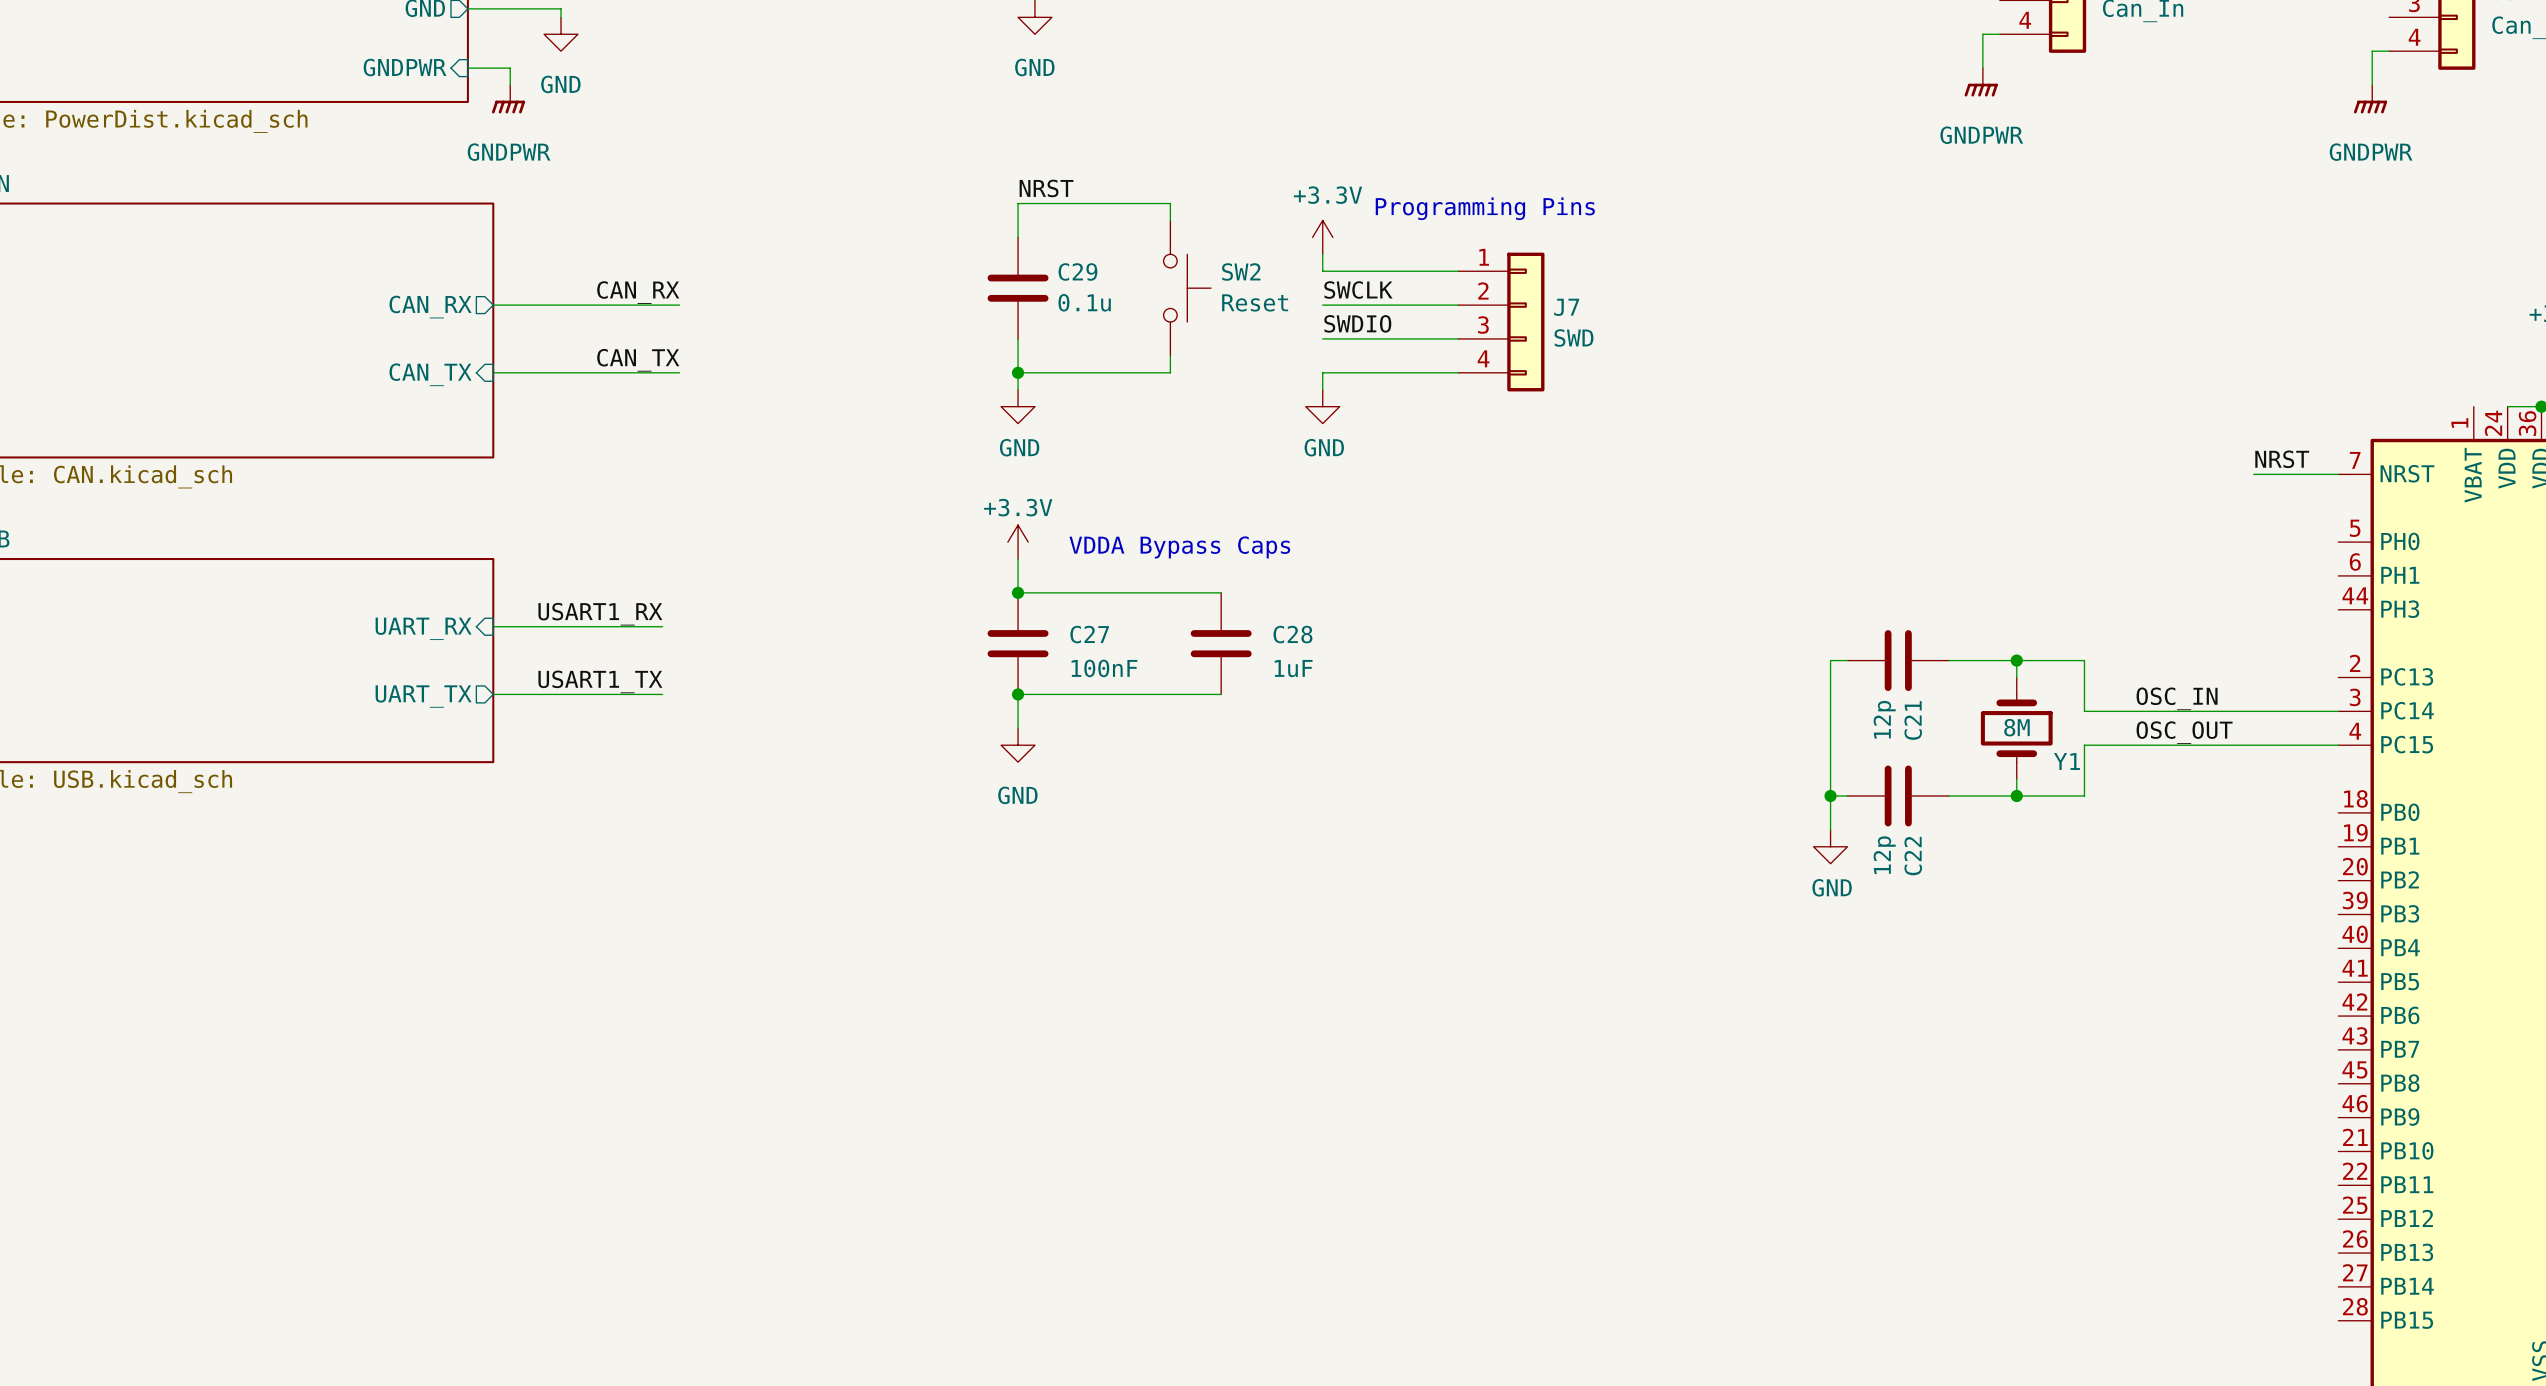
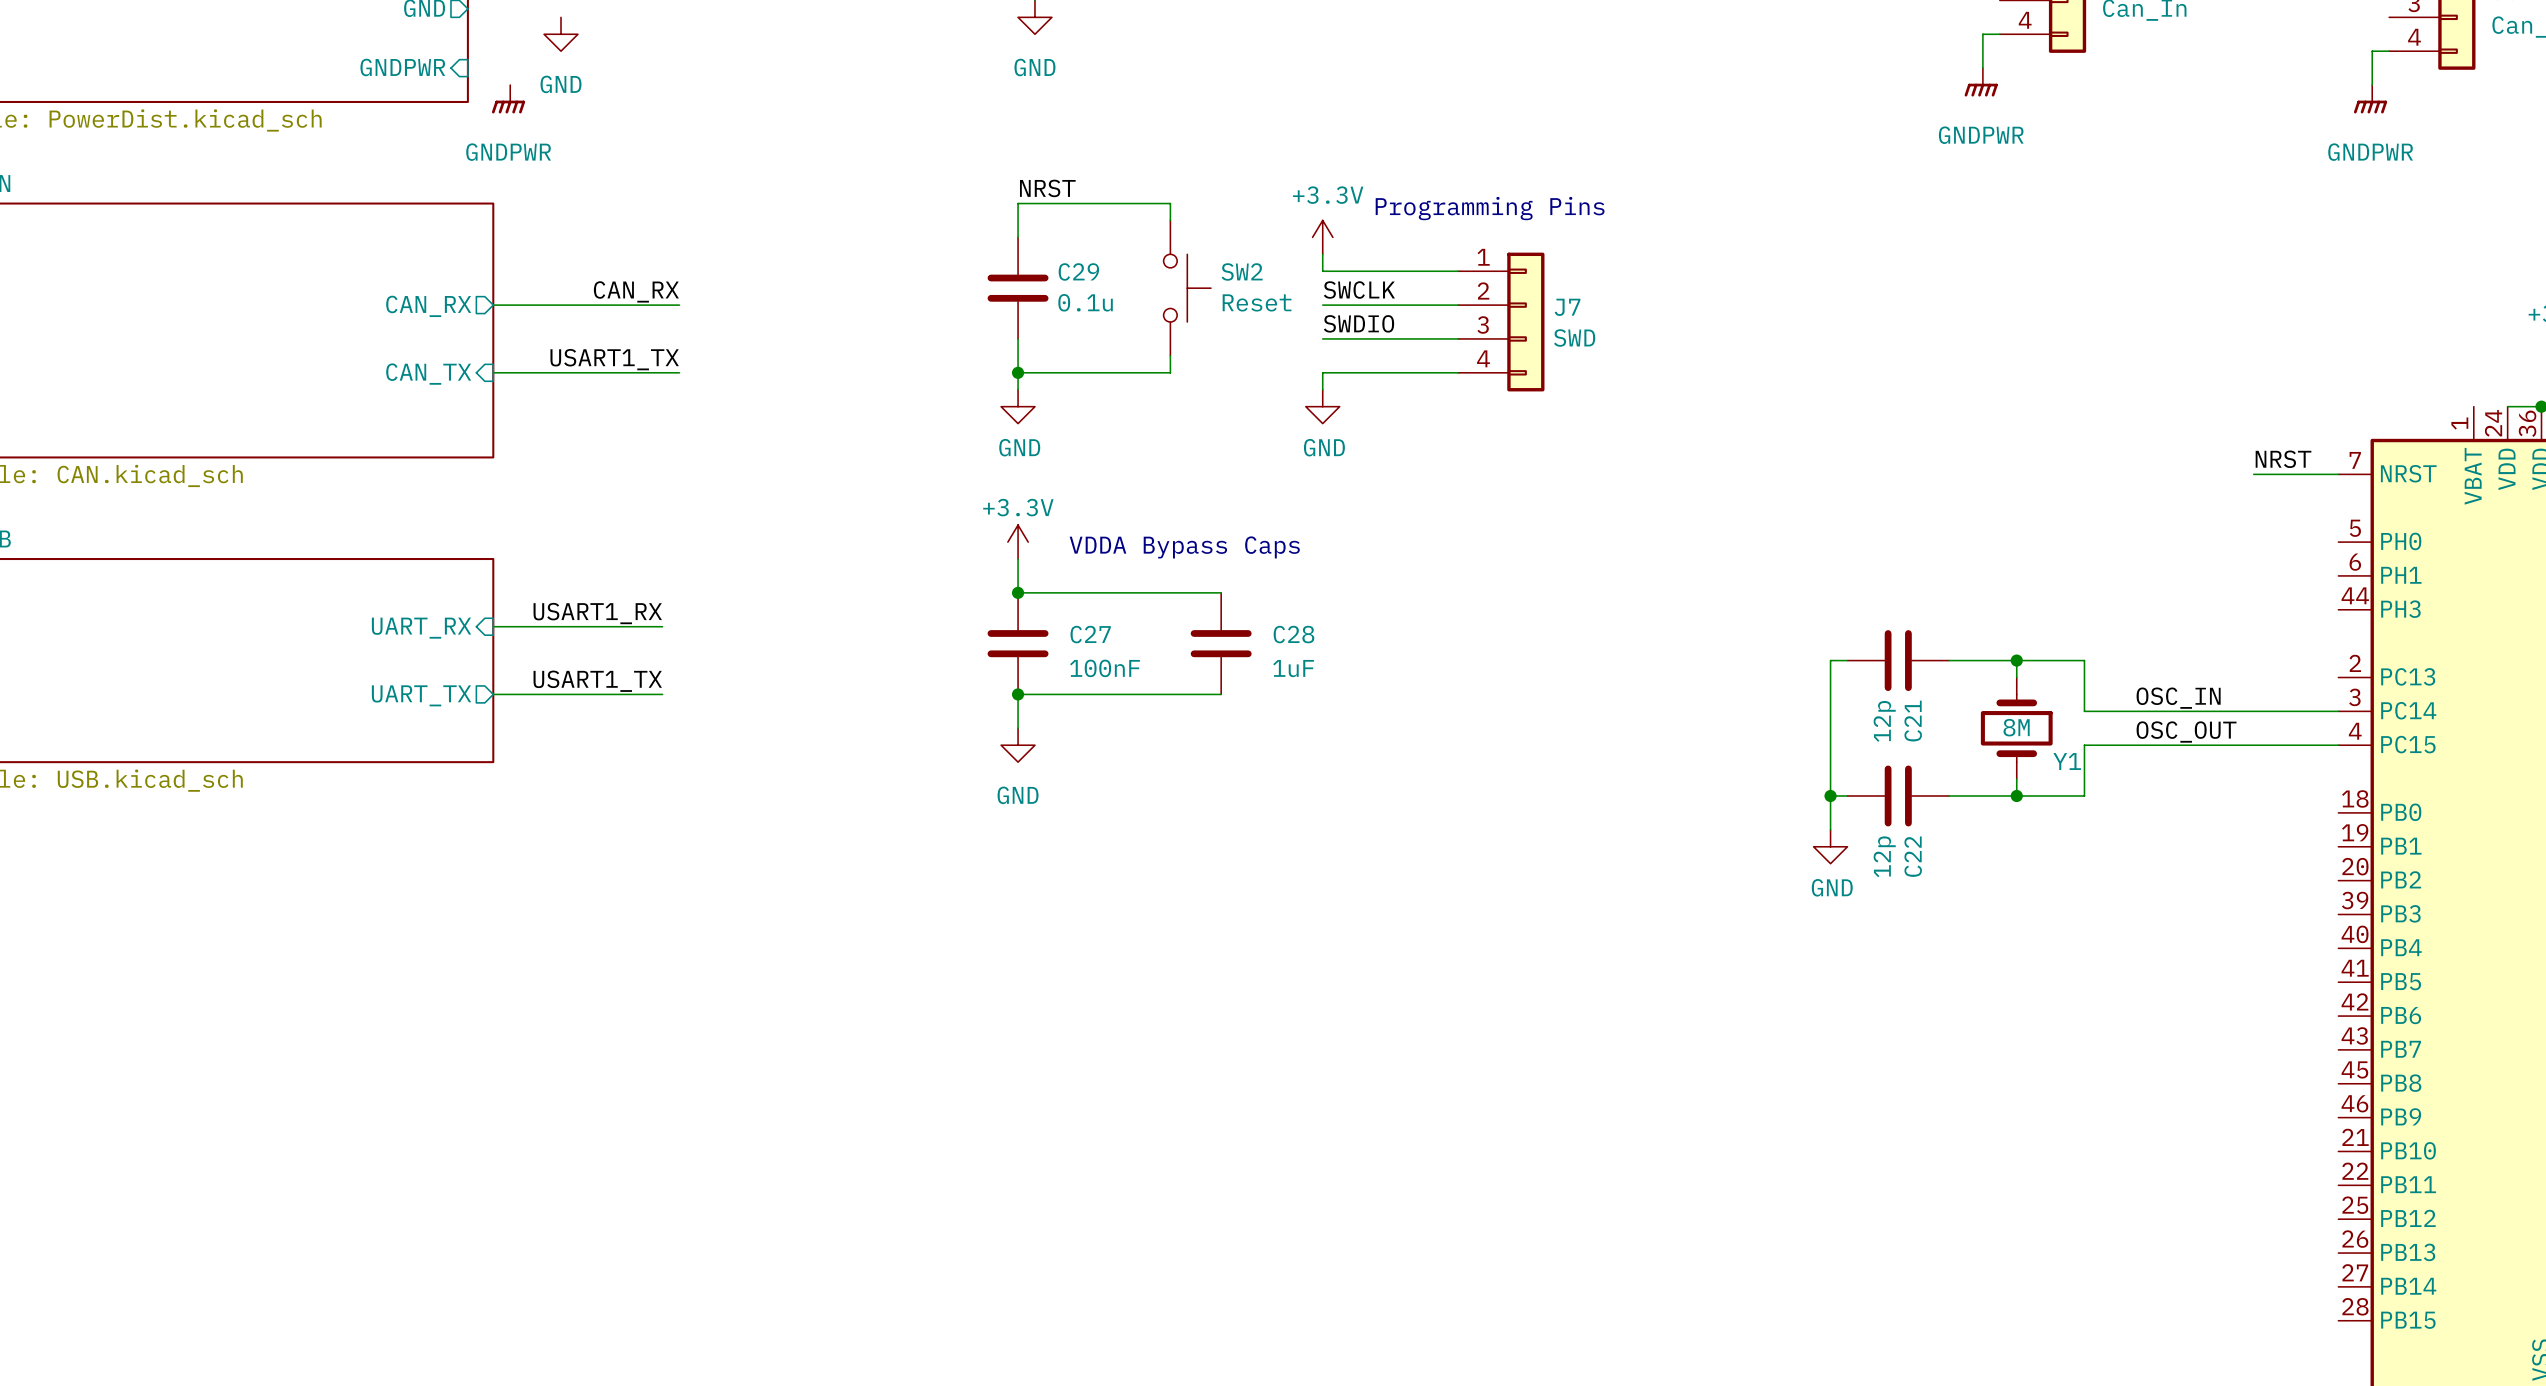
wire: (467, 8) (561, 8) (561, 17) -> none
wire: (467, 68) (510, 68) (510, 85) -> none
label: CAN_TX (638, 360) -> USART1_TX (614, 359)

